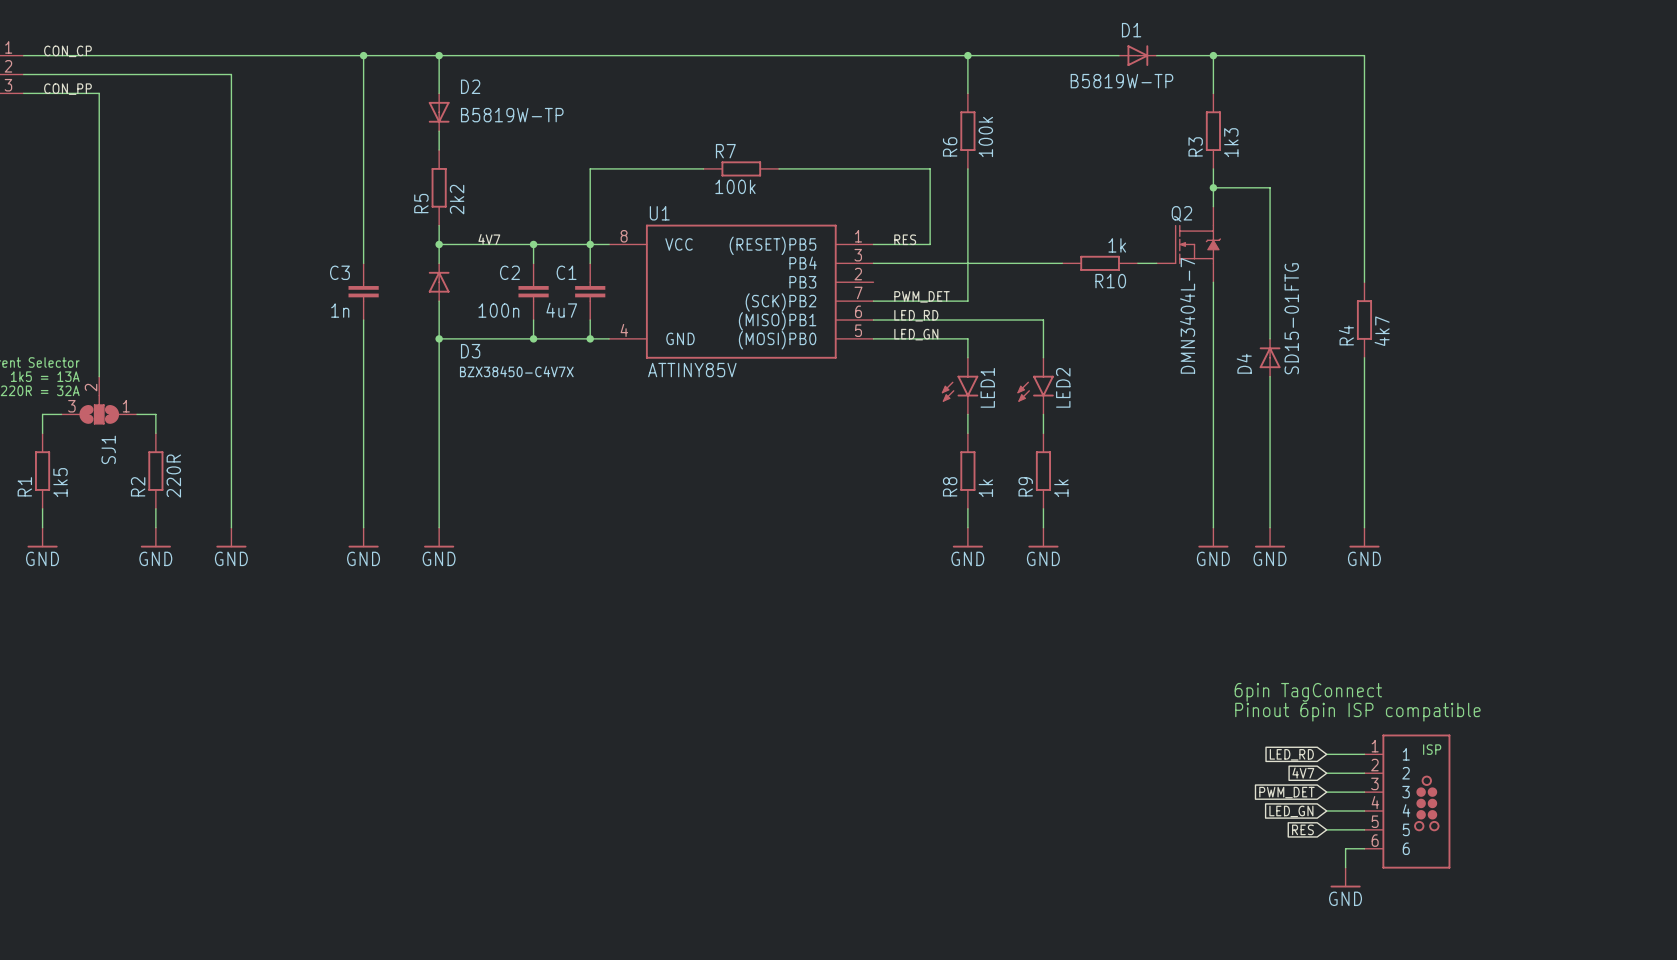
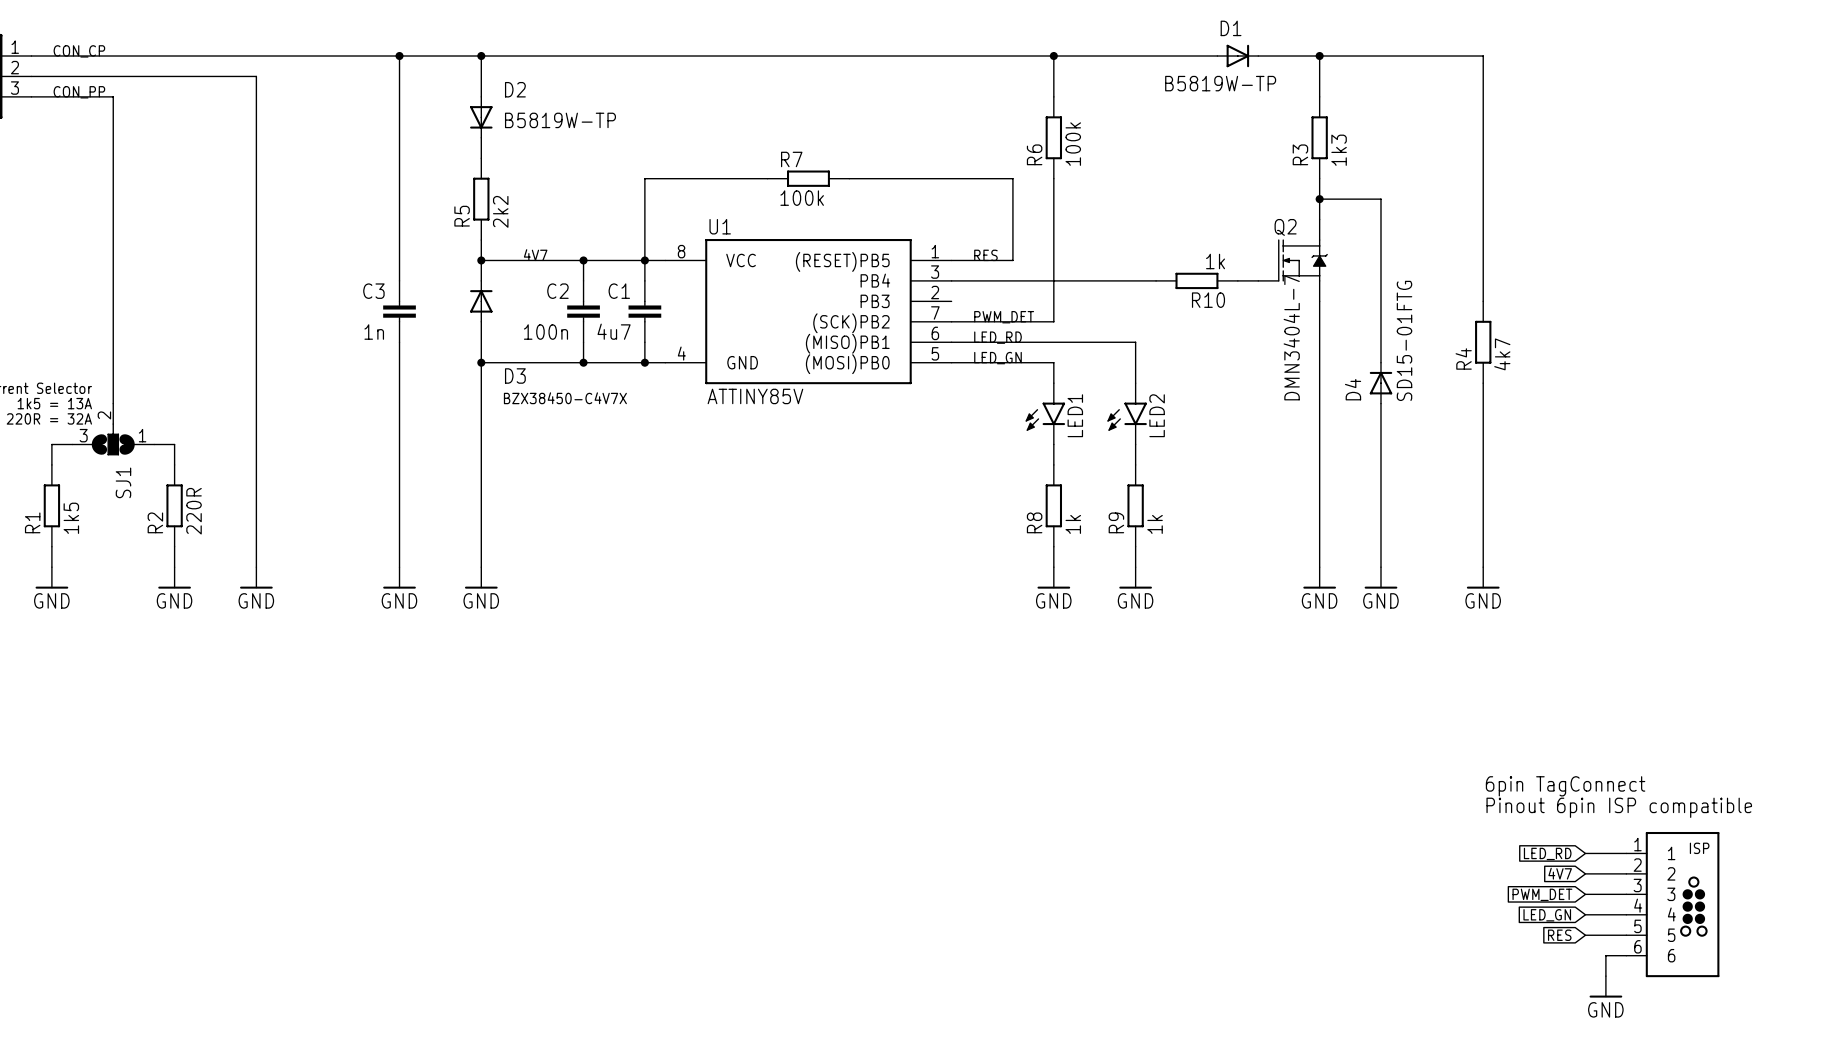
text position: 6pin TagConnect (1308, 692) -> 6pin TagConnect (1565, 786)
text position: Pinout 6pin ISP compatible (1357, 712) -> Pinout 6pin ISP compatible (1619, 807)
text position: ISP (1432, 749) -> ISP (1699, 848)
global label position: LED_RD (1291, 754) -> LED_RD (1547, 853)
wire: (1326, 754) (1364, 754) -> (1585, 853) (1626, 853)
global label position: 4V7 (1303, 773) -> 4V7 (1560, 873)
wire: (1326, 773) (1364, 773) -> (1585, 873) (1626, 873)
global label position: PWM_DET (1286, 792) -> PWM_DET (1542, 894)
wire: (1326, 792) (1364, 792) -> (1585, 894) (1626, 894)
part position: (1407, 801) -> (1672, 904)
global label position: LED_GN (1291, 811) -> LED_GN (1547, 915)
wire: (1326, 811) (1364, 811) -> (1585, 914) (1626, 914)
global label position: RES (1302, 829) -> RES (1559, 935)
wire: (1326, 829) (1364, 829) -> (1585, 935) (1626, 935)
wire: (1364, 848) (1345, 848) (1345, 867) -> (1626, 955) (1605, 955) (1605, 976)
power symbol position: GND (1345, 877) -> GND (1605, 986)

